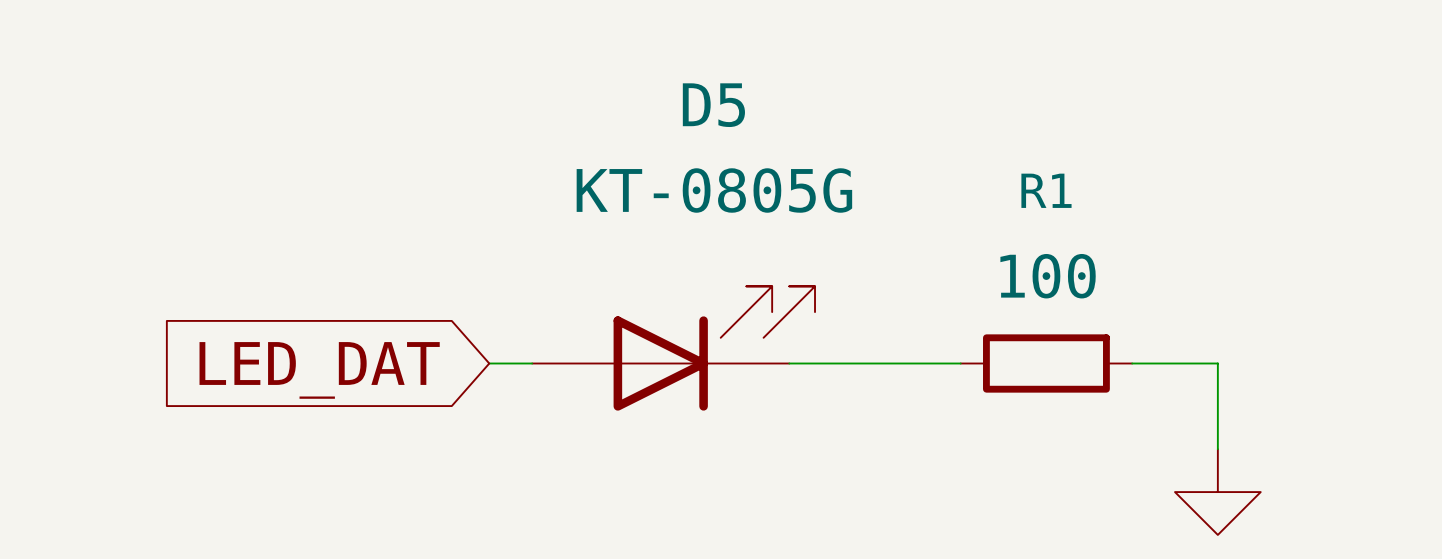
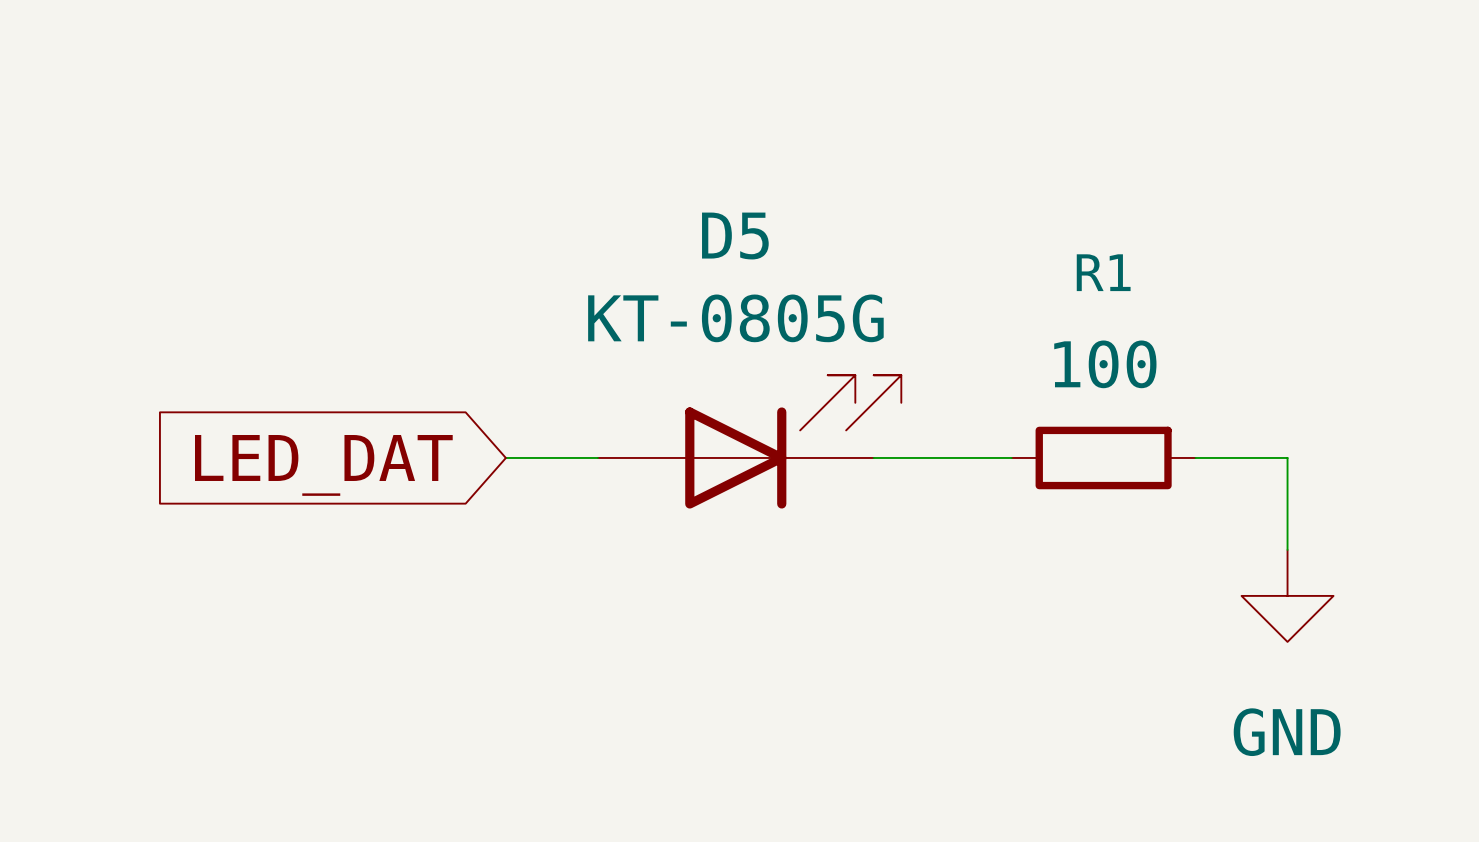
D5 name position: D5 (713, 105) -> D5 (735, 236)
D5 value position: KT-0805G (714, 190) -> KT-0805G (735, 318)
D5 position: (673, 348) -> (749, 441)

